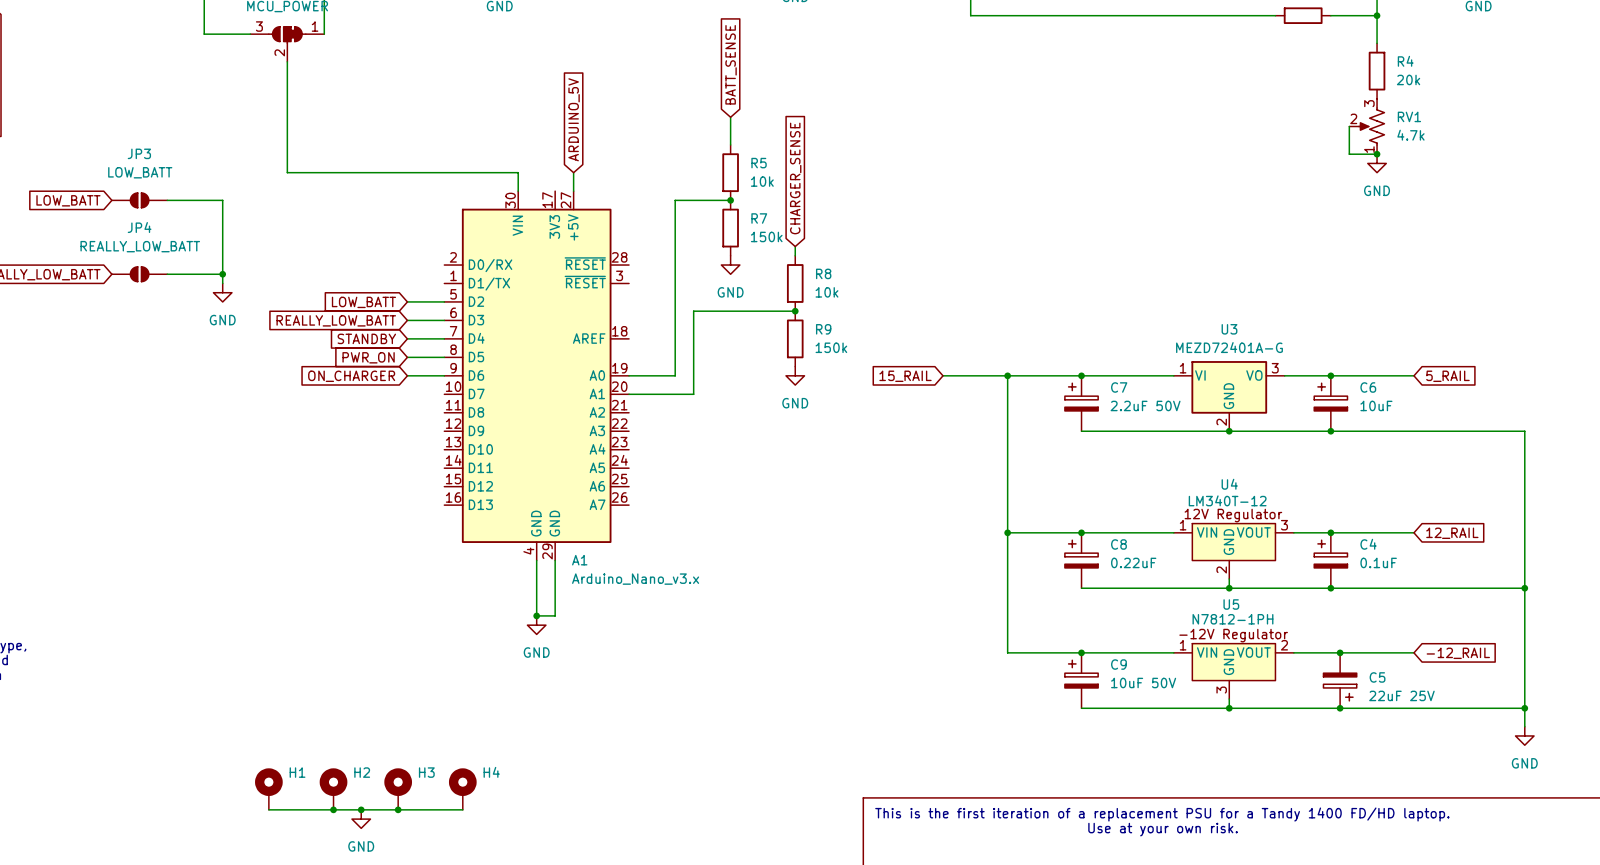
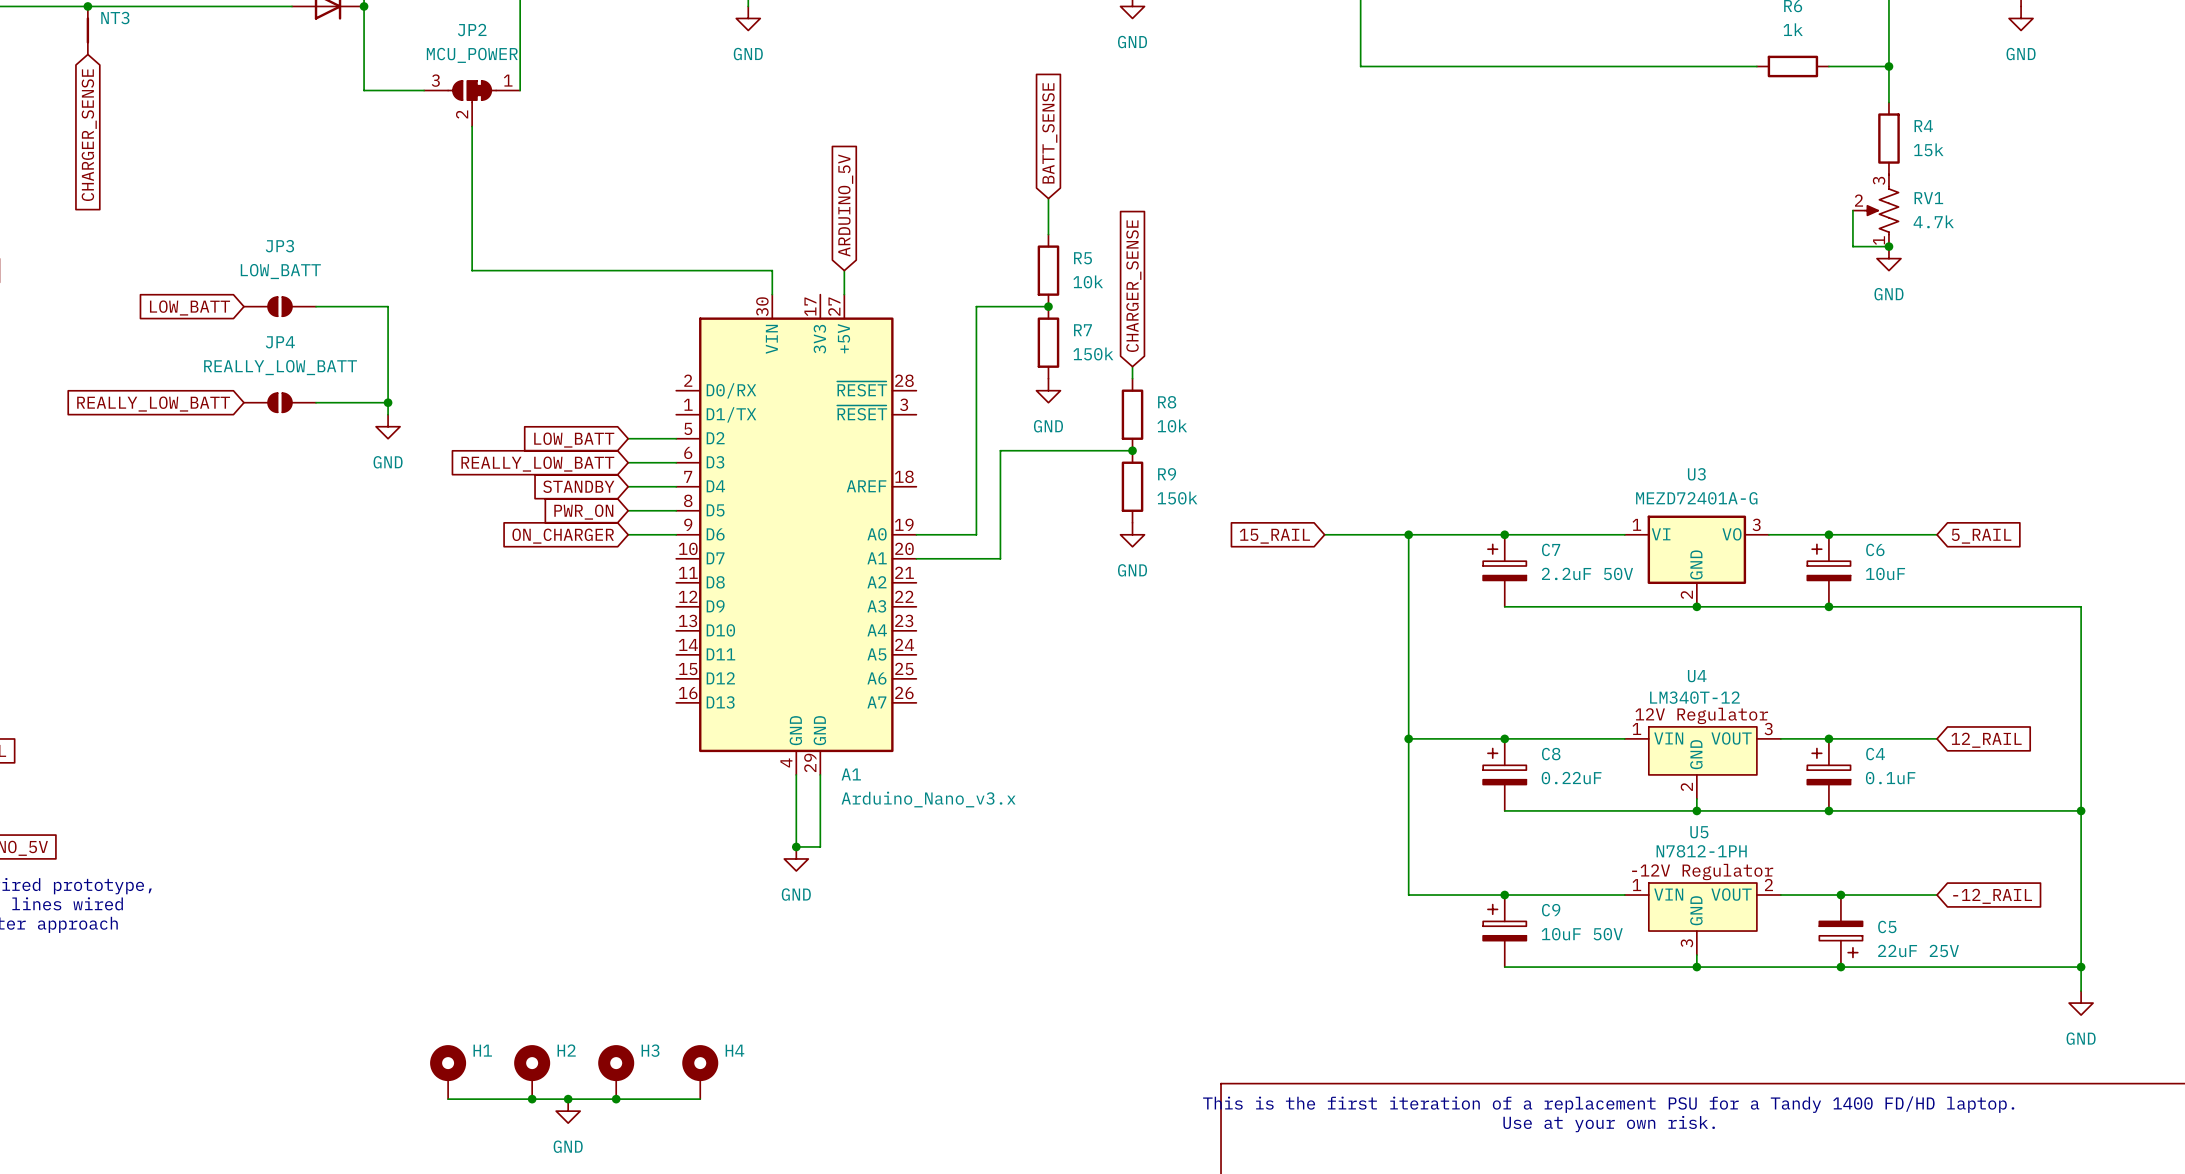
R4 value: 20k (1408, 79) -> 15k (1928, 149)

